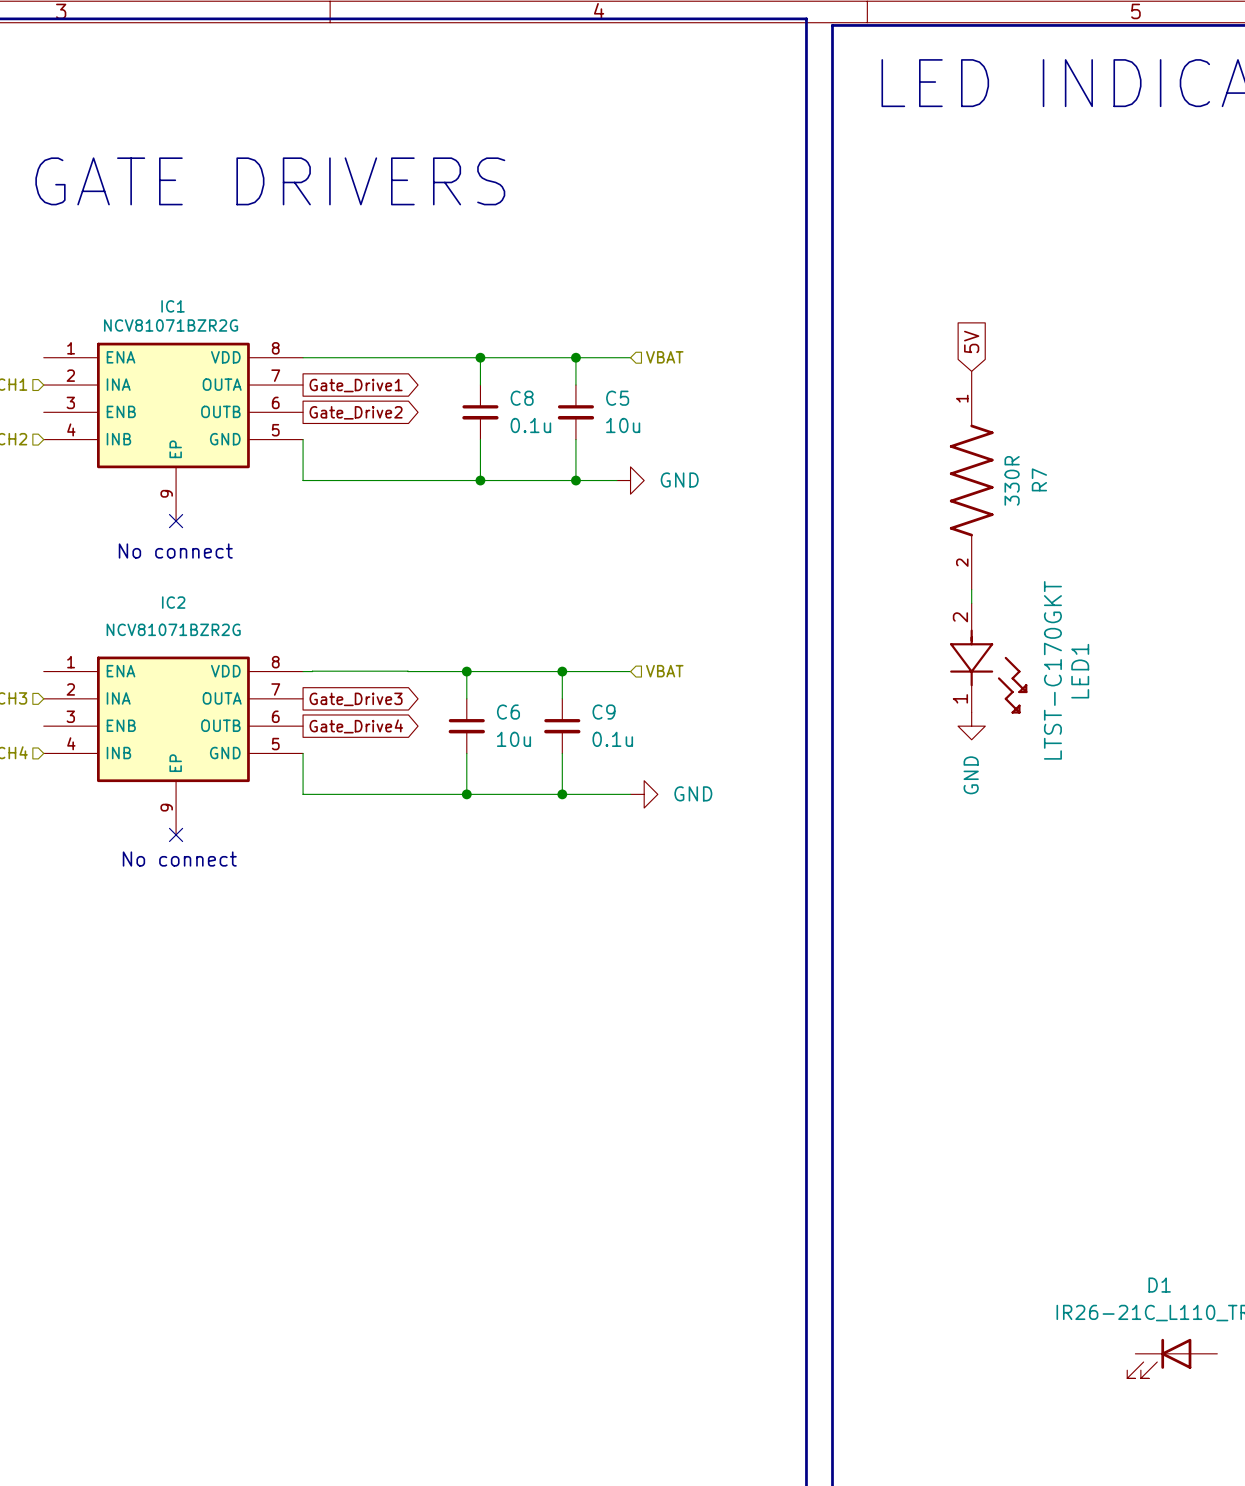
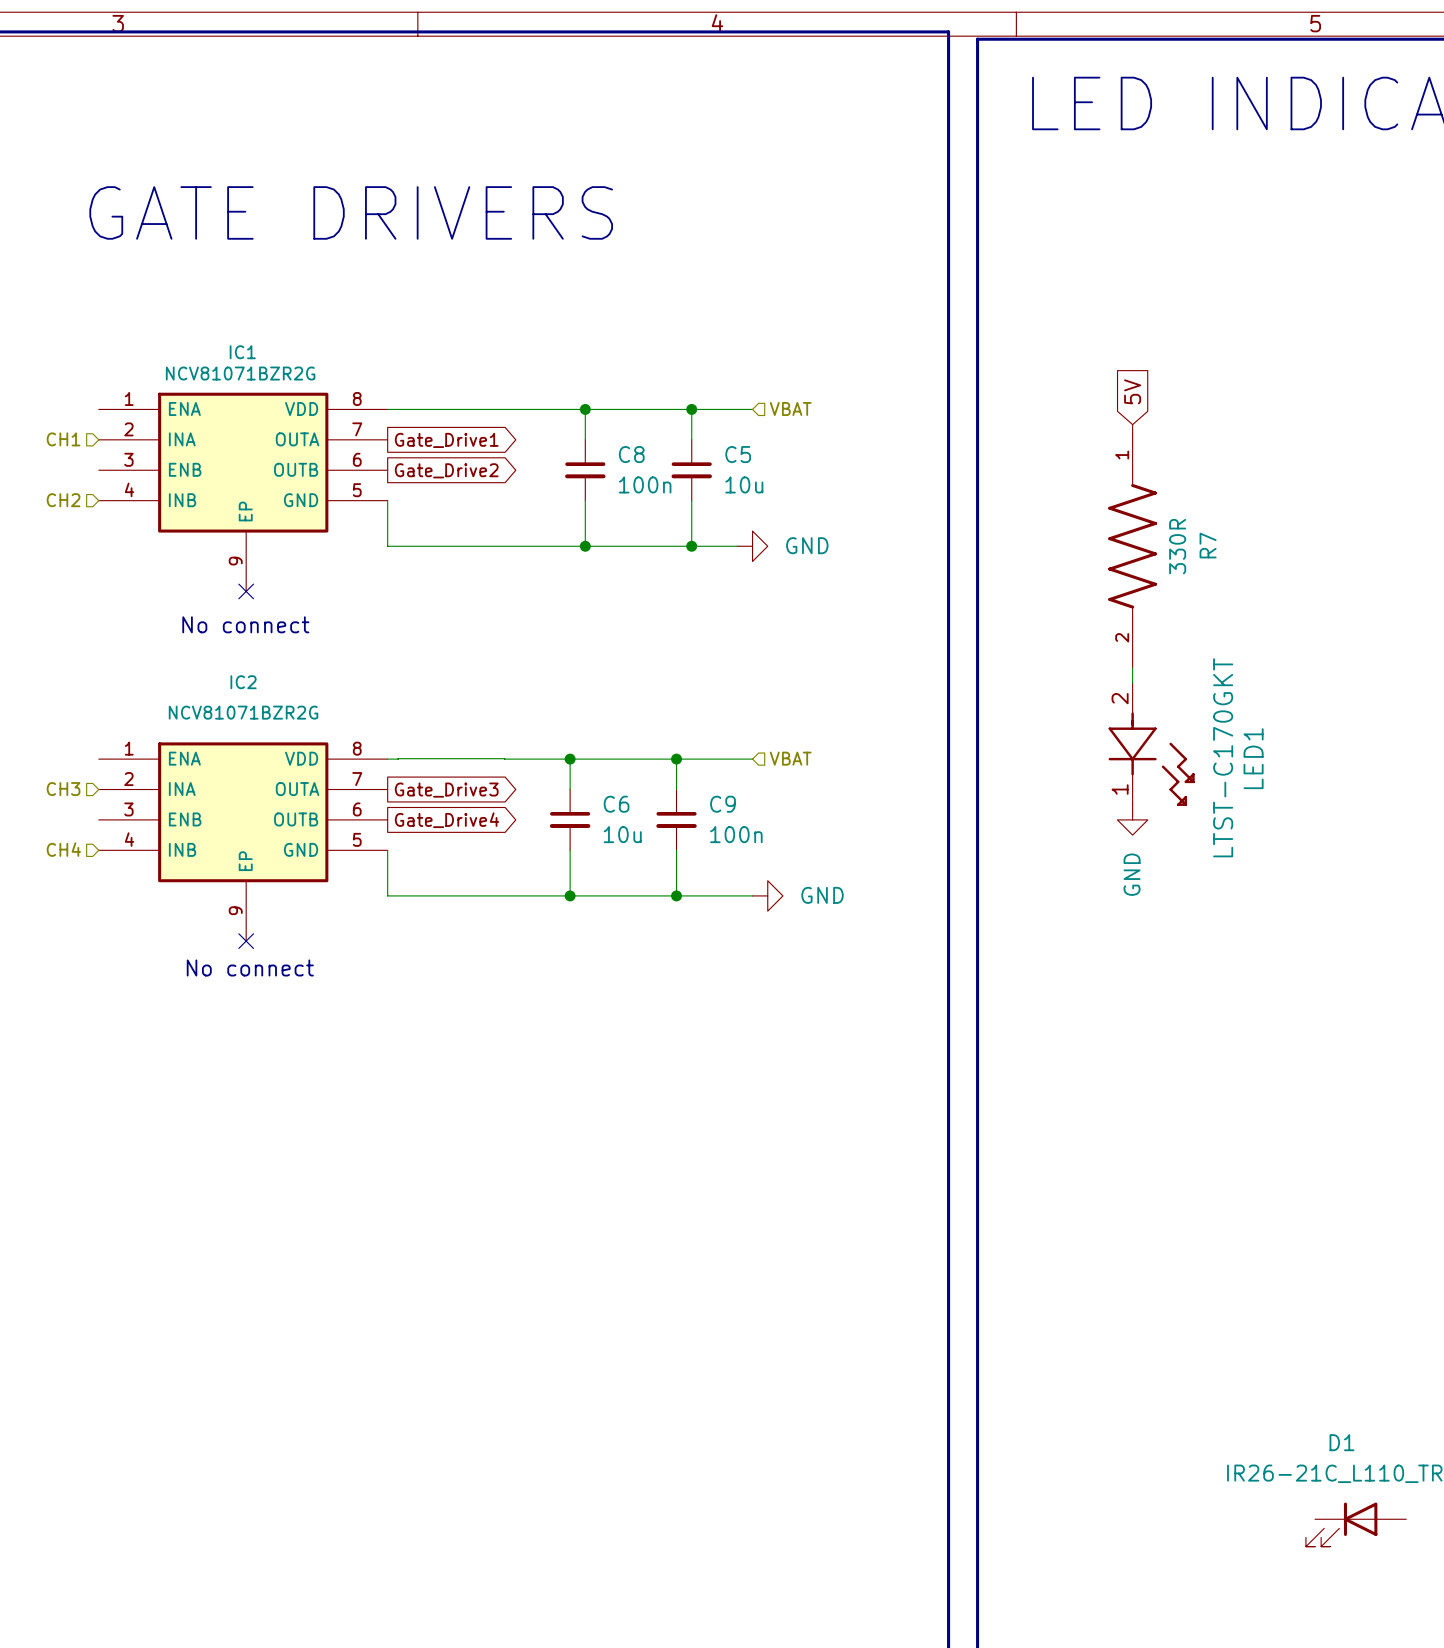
C8 value: 0.1u (530, 425) -> 100n (645, 484)
C9 value: 0.1u (612, 739) -> 100n (736, 834)

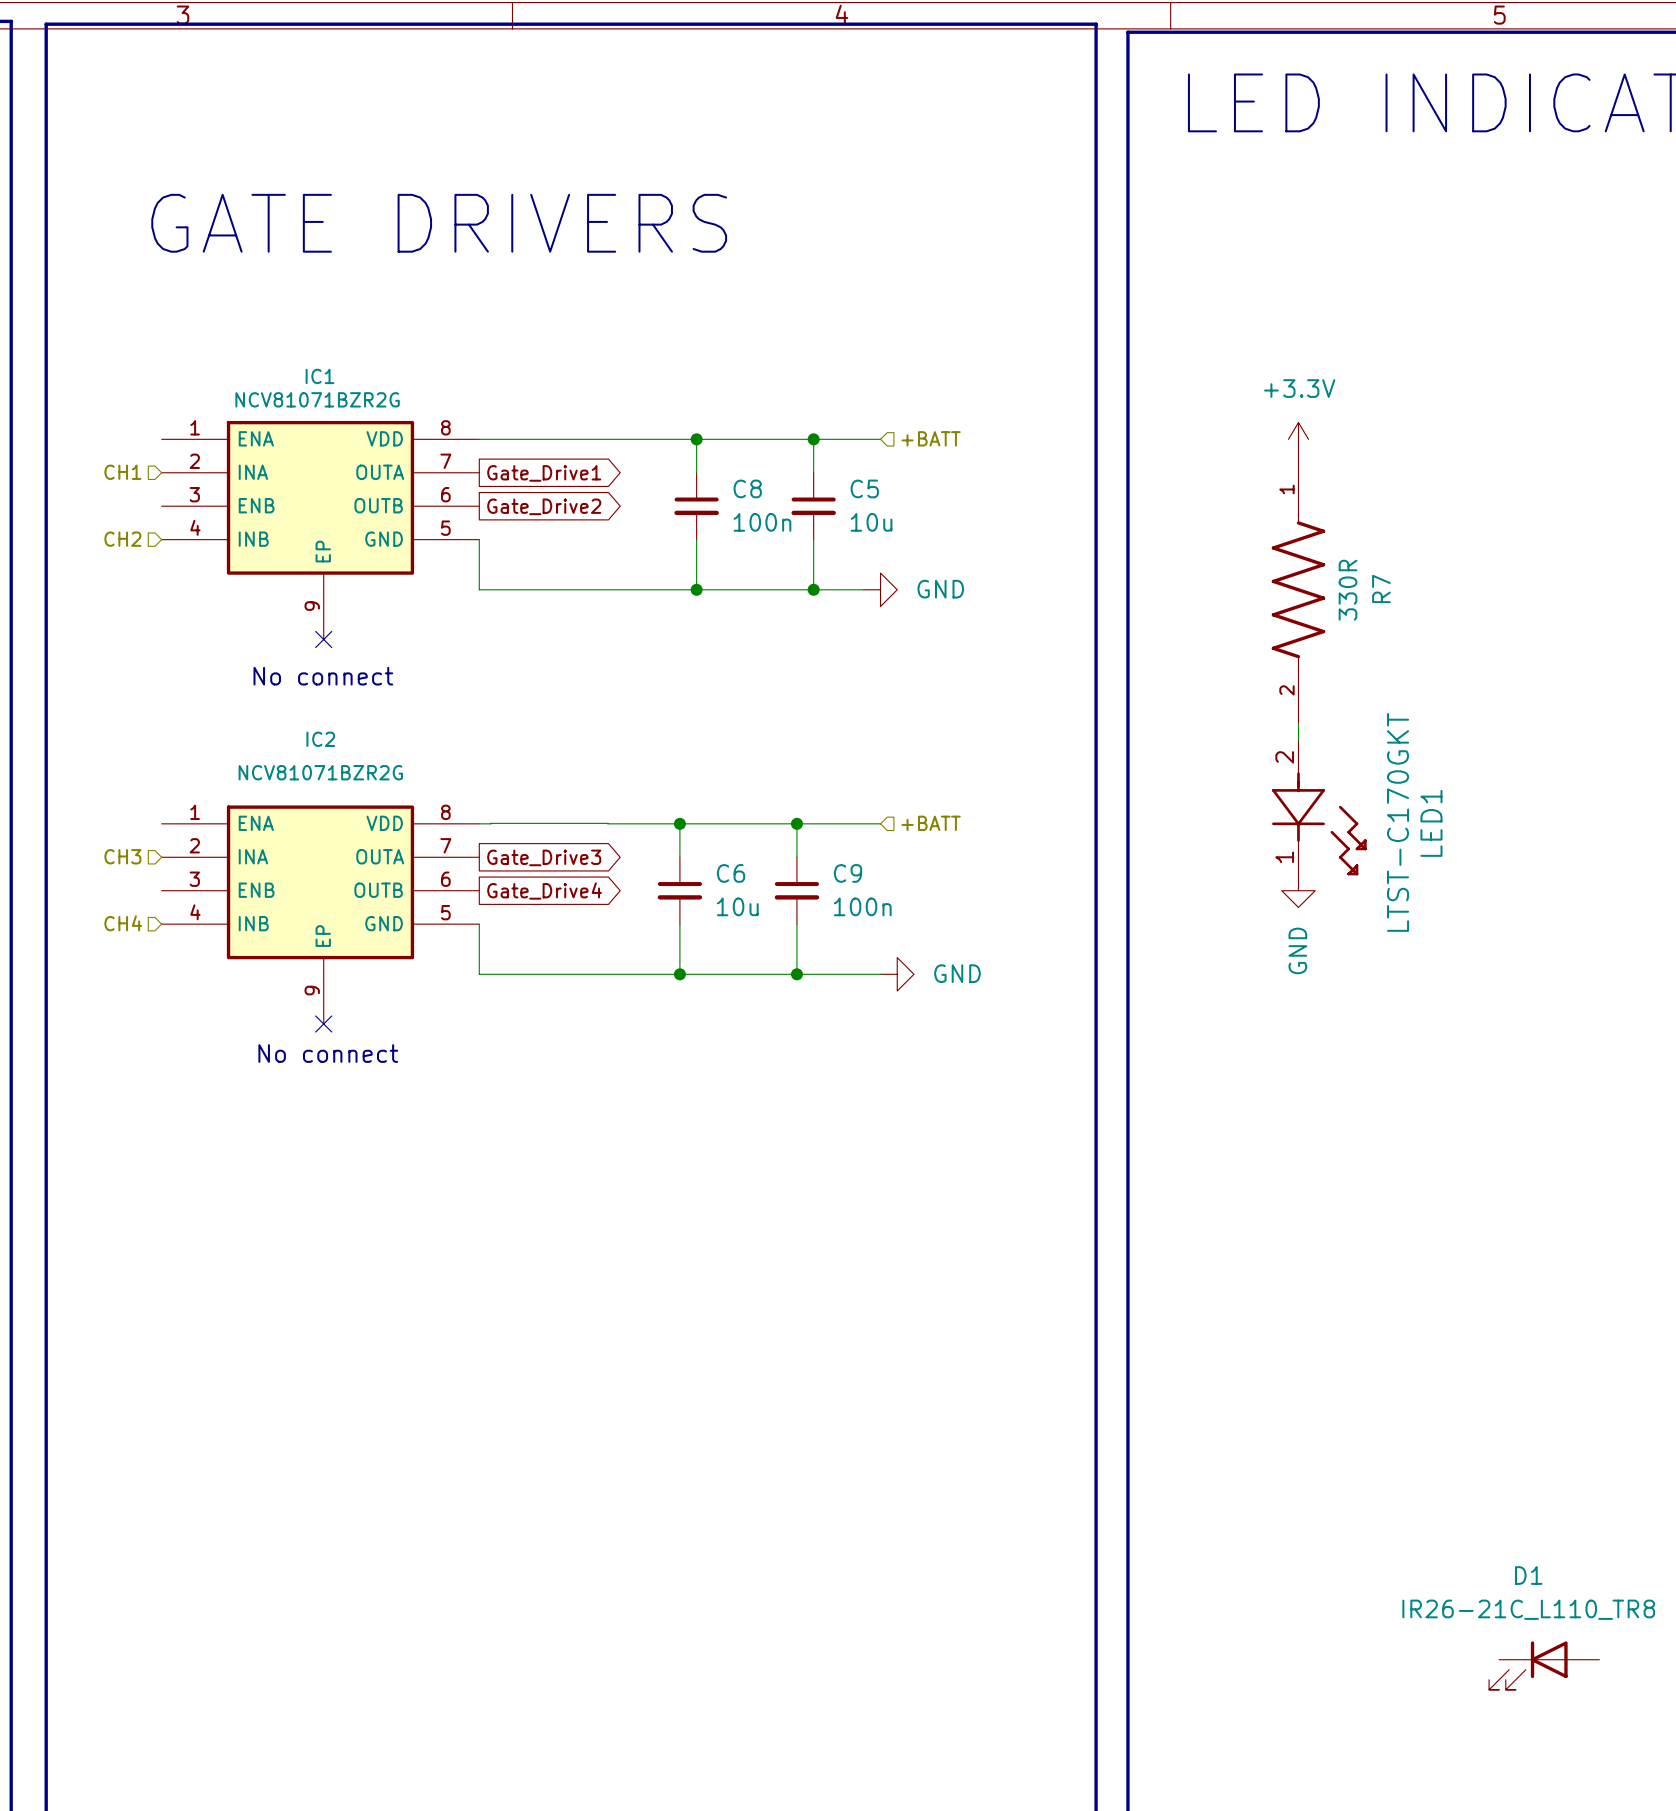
global label: 5V (1132, 391) -> none
hierarchical label: VBAT (790, 408) -> +BATT (931, 438)
power symbol: none -> +3.3V (1298, 439)
hierarchical label: VBAT (790, 758) -> +BATT (931, 823)

